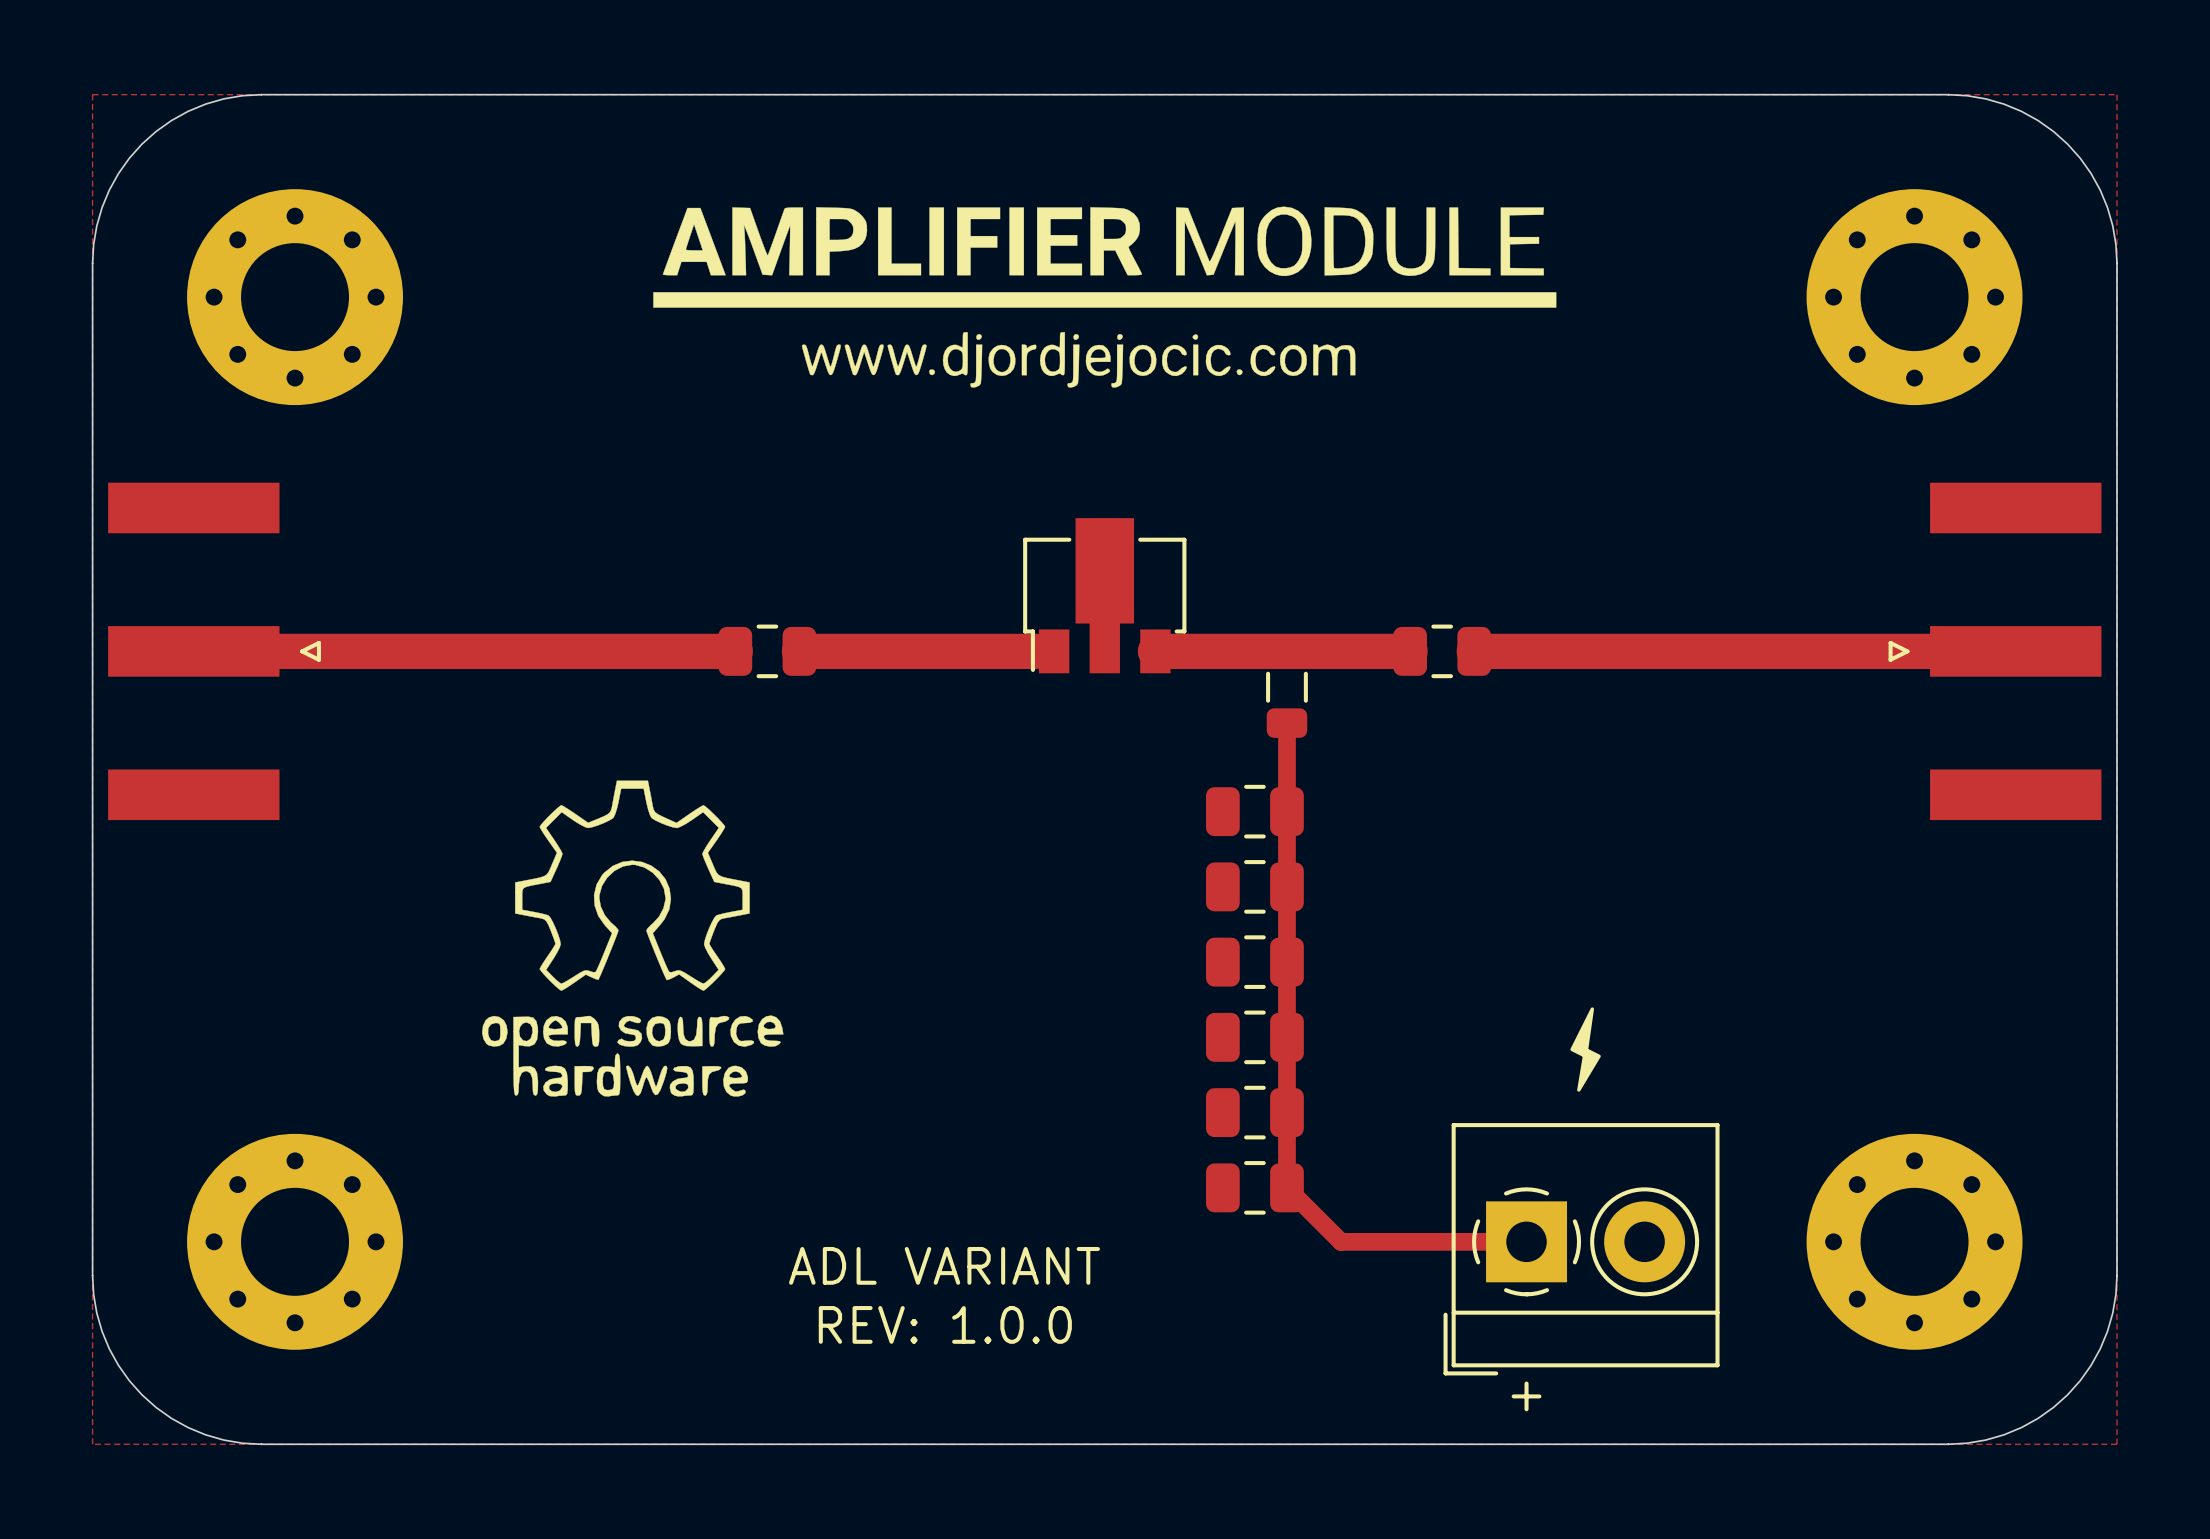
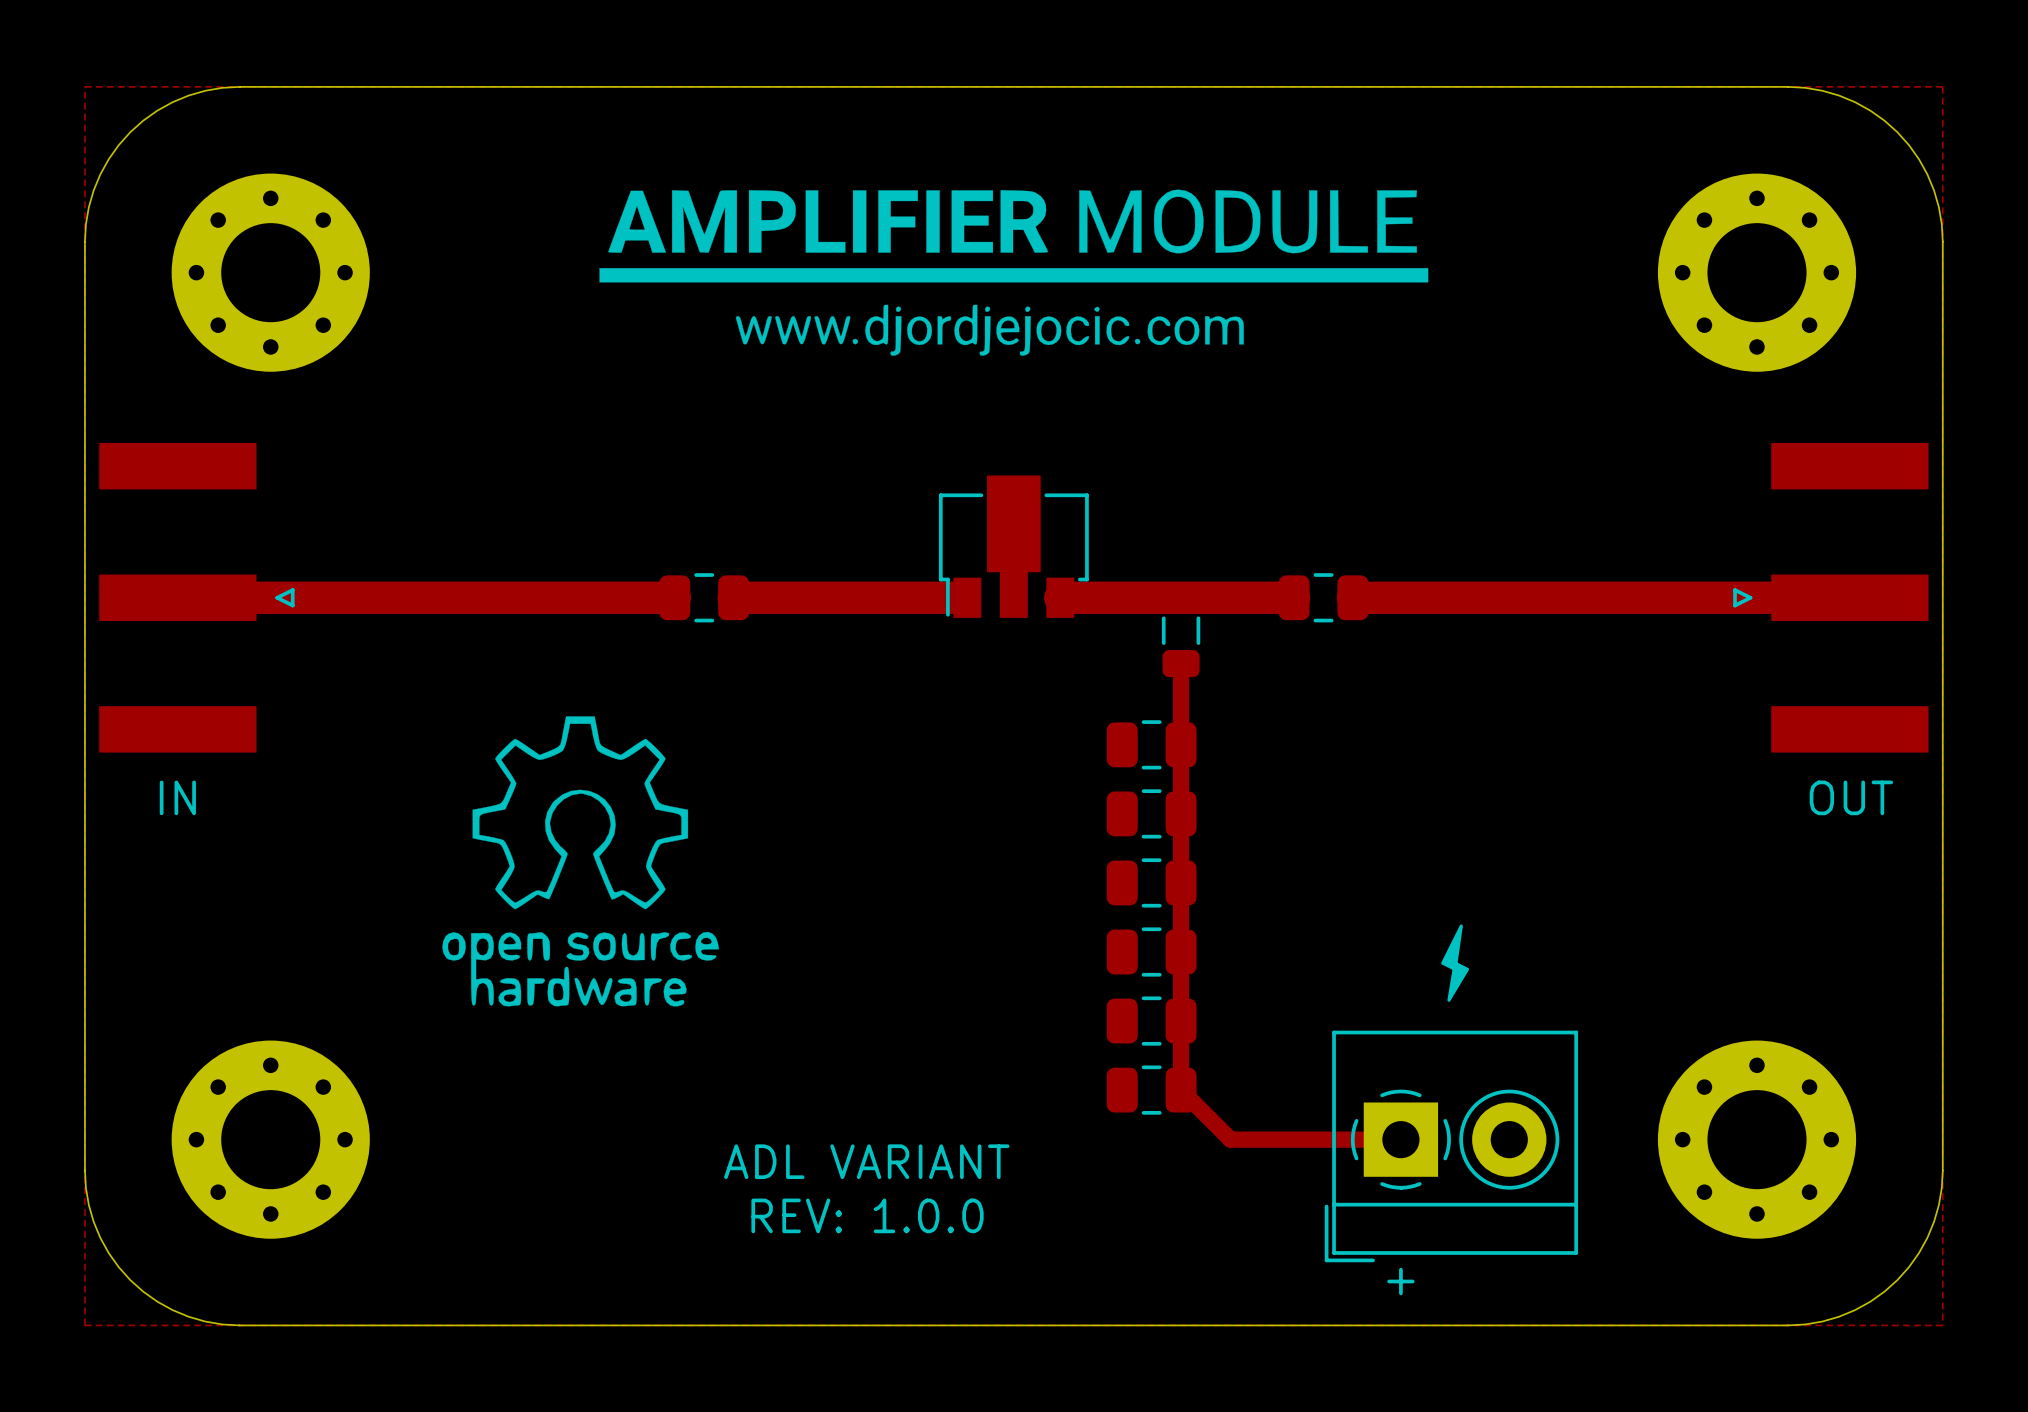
text: none -> IN (177, 797)
text: none -> OUT (1851, 797)

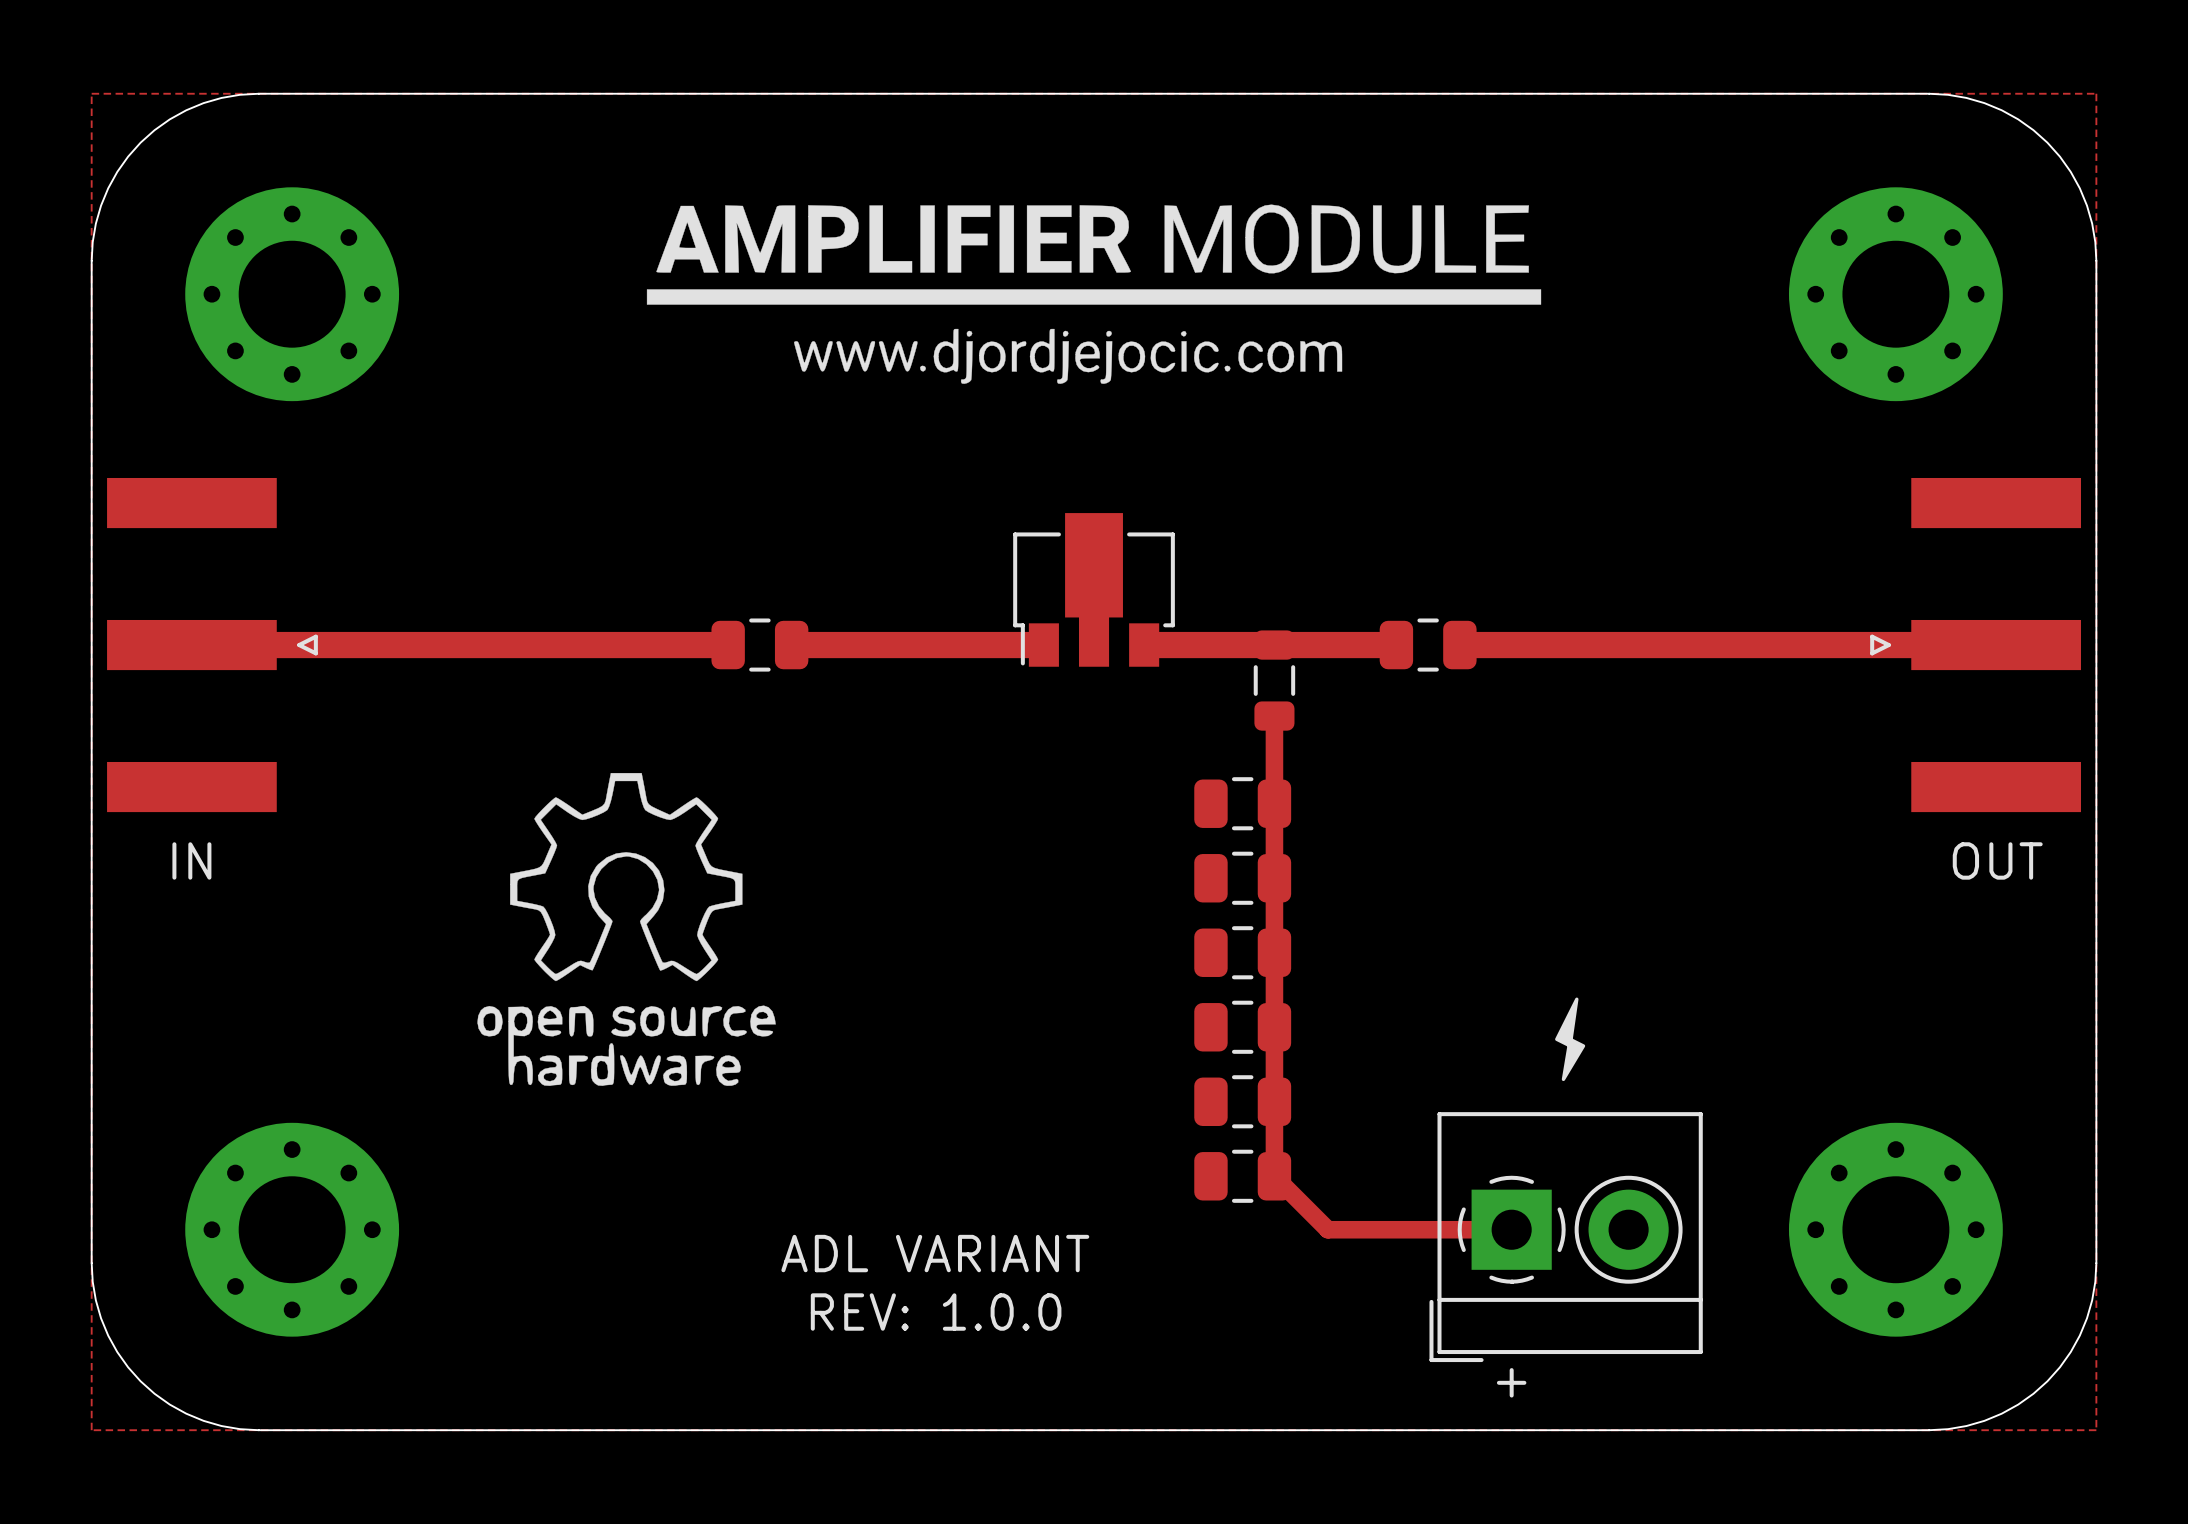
track width: thick (177, 597) (674, 597) -> thin (191, 645) (728, 645)
track width: thick (733, 597) (951, 597) -> thin (791, 645) (1027, 645)
track width: thick (1060, 597) (1294, 597) -> thin (1144, 645) (1396, 645)
track width: thick (1352, 597) (1849, 597) -> thin (1459, 645) (1996, 645)

